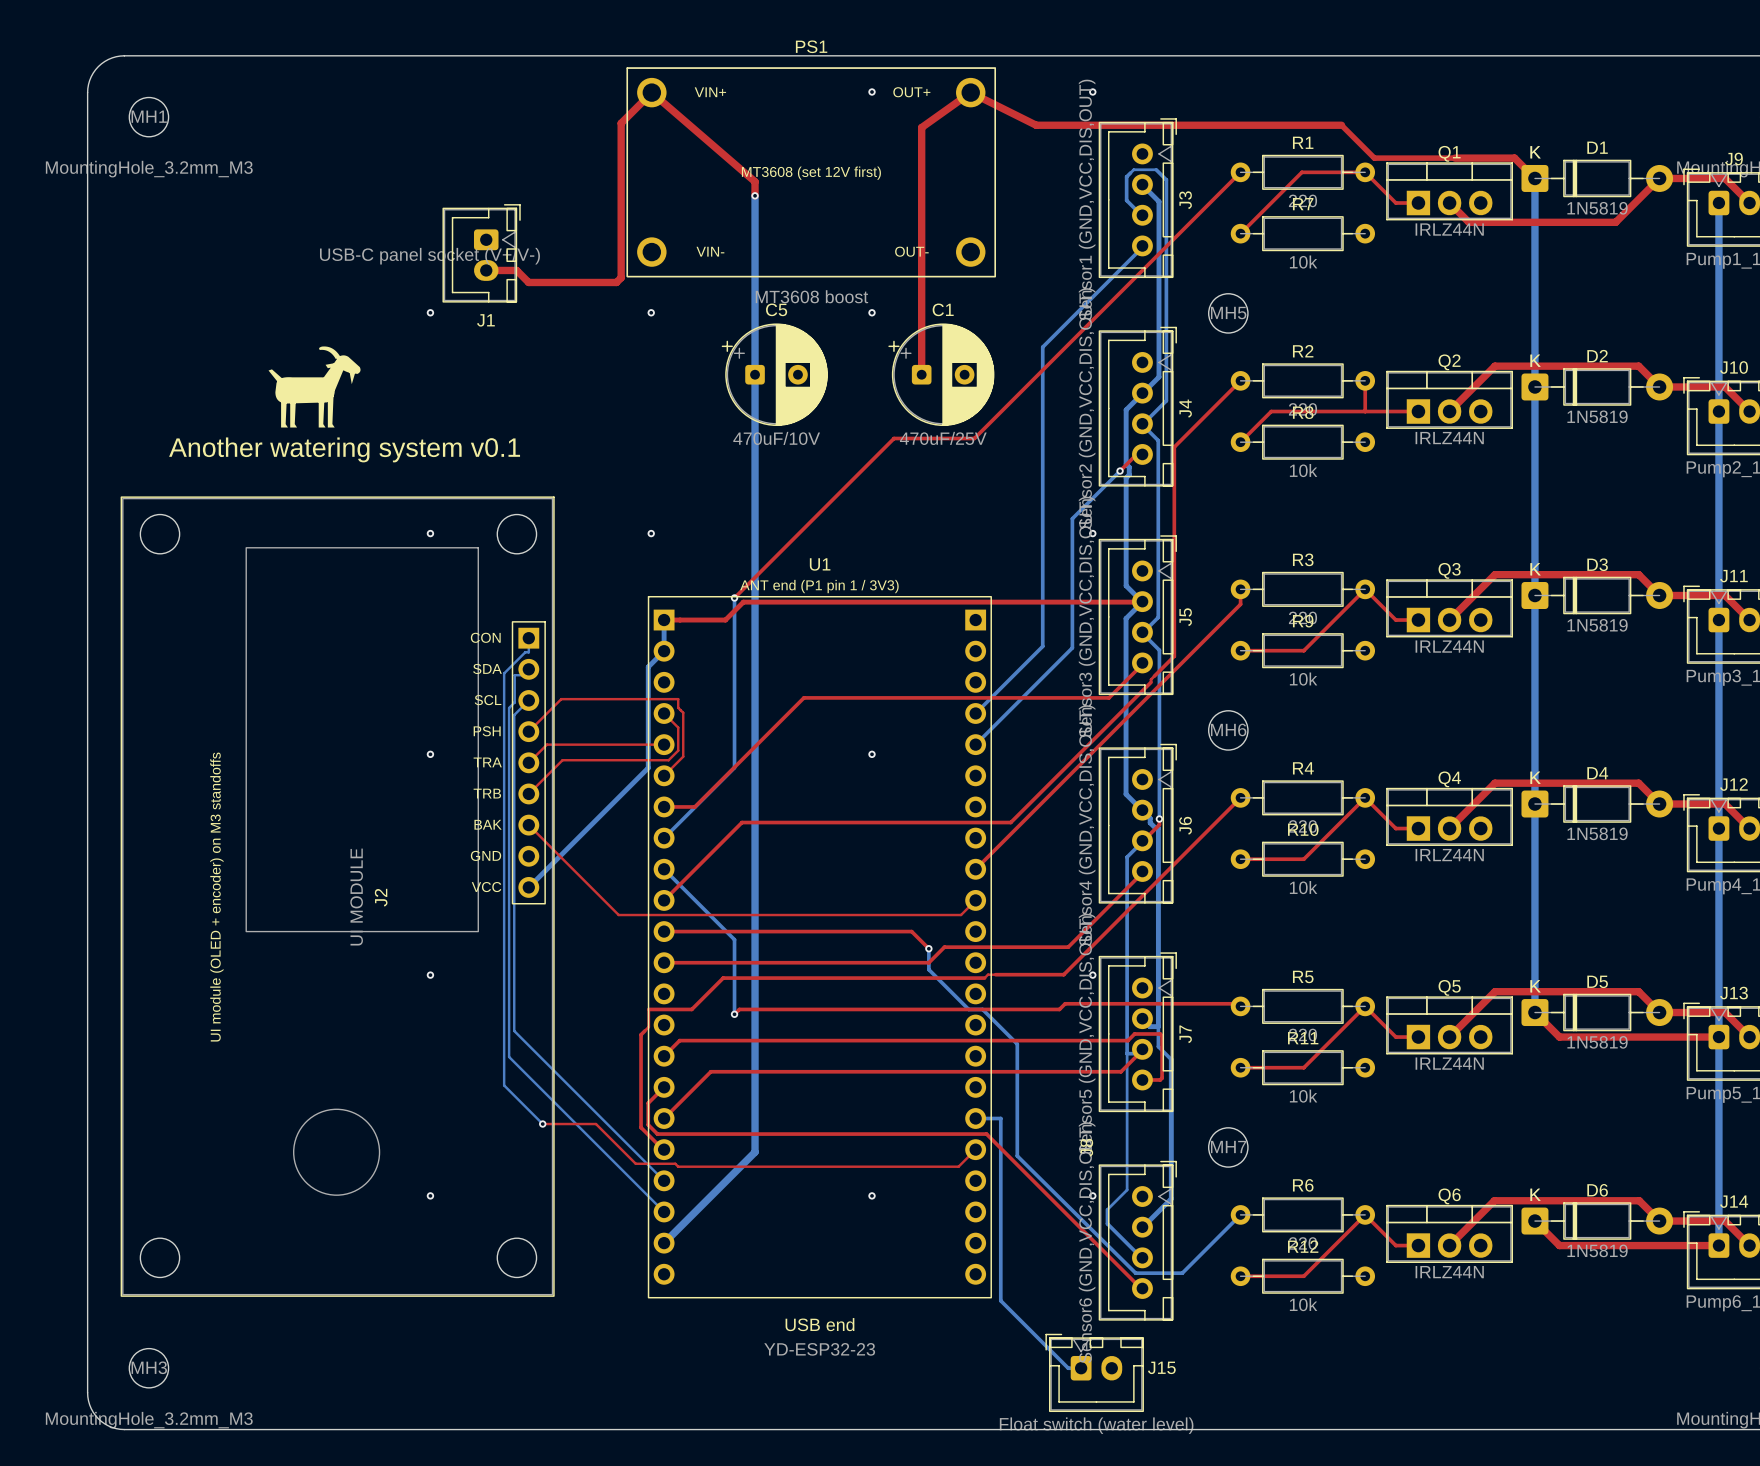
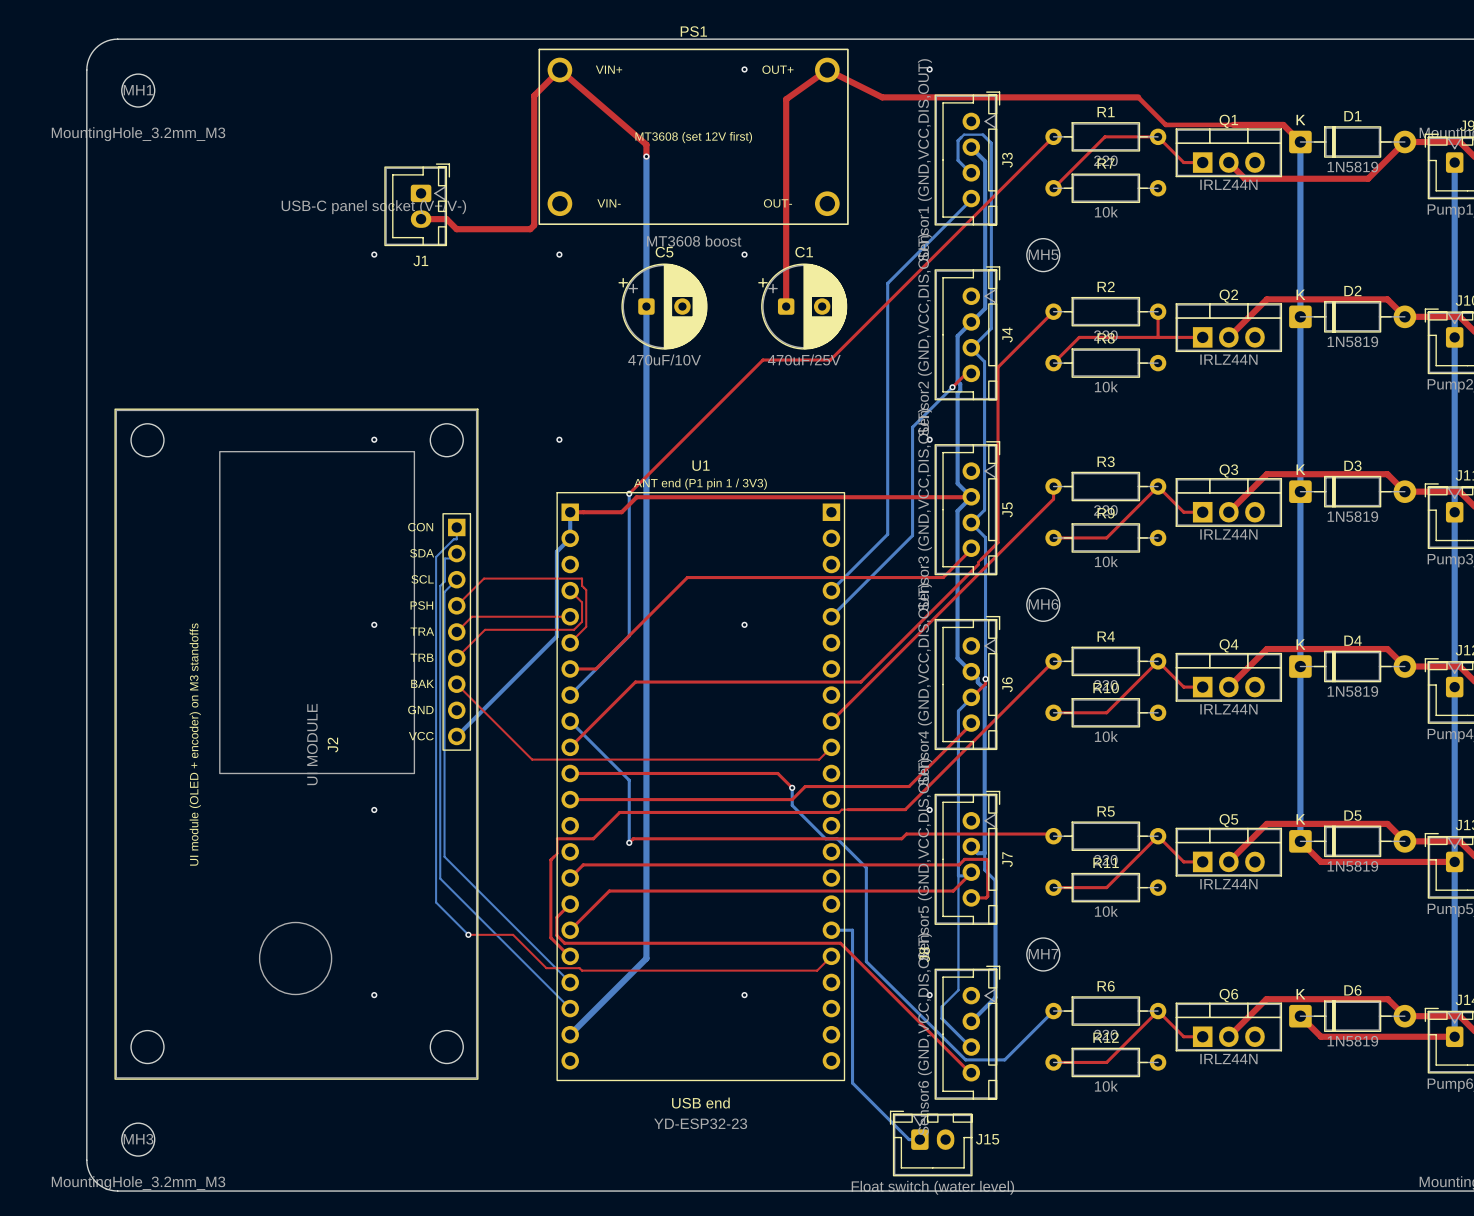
drawing: [268, 346, 361, 428] -> none
text: Another watering system v0.1 (344, 449) -> none

